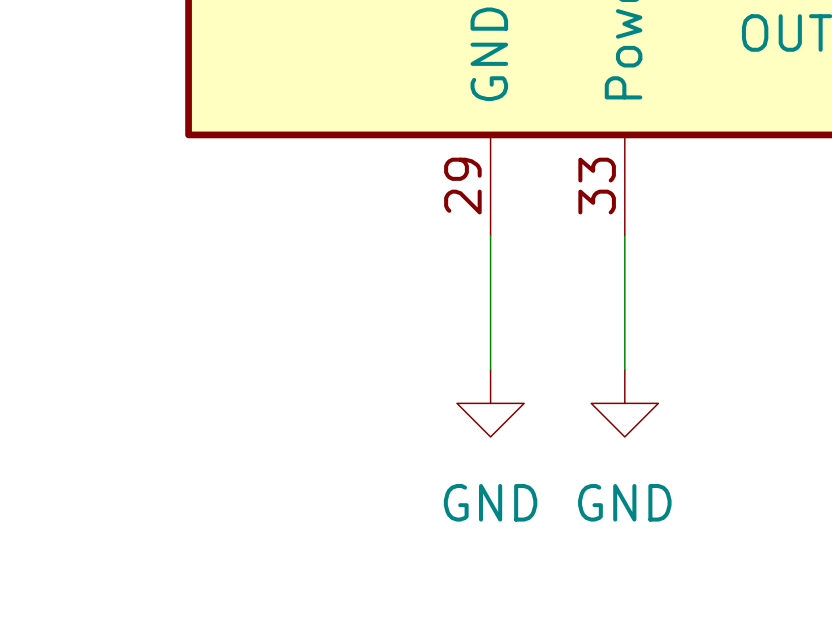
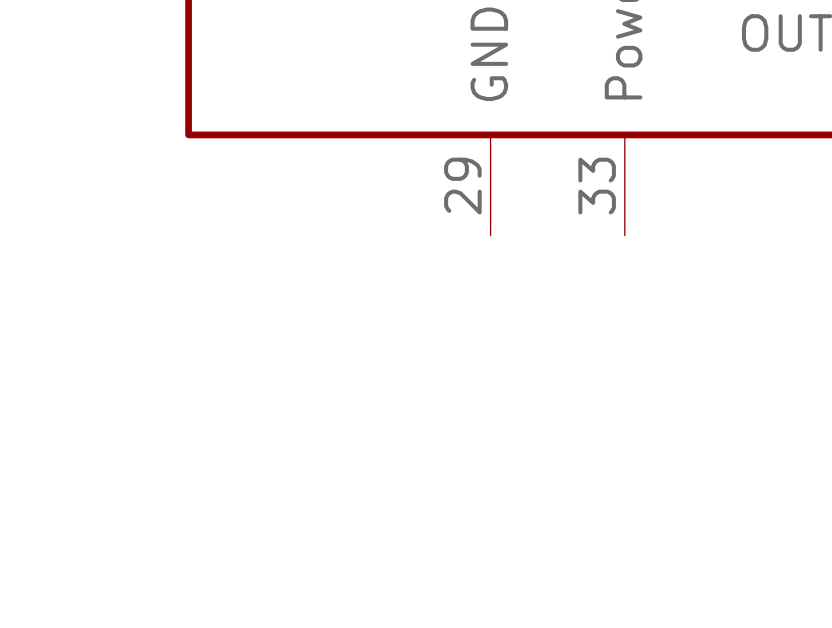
wire: (490, 235) (490, 369) -> none
wire: (624, 235) (624, 369) -> none
power symbol: GND (490, 403) -> none
power symbol: GND (624, 403) -> none

